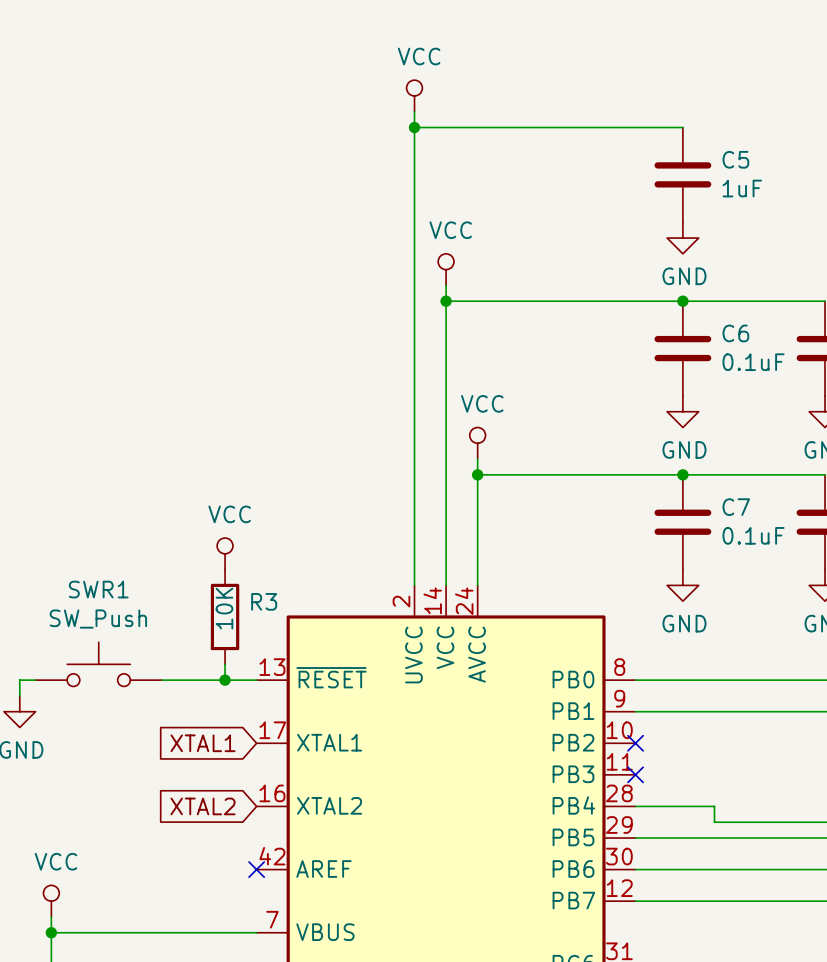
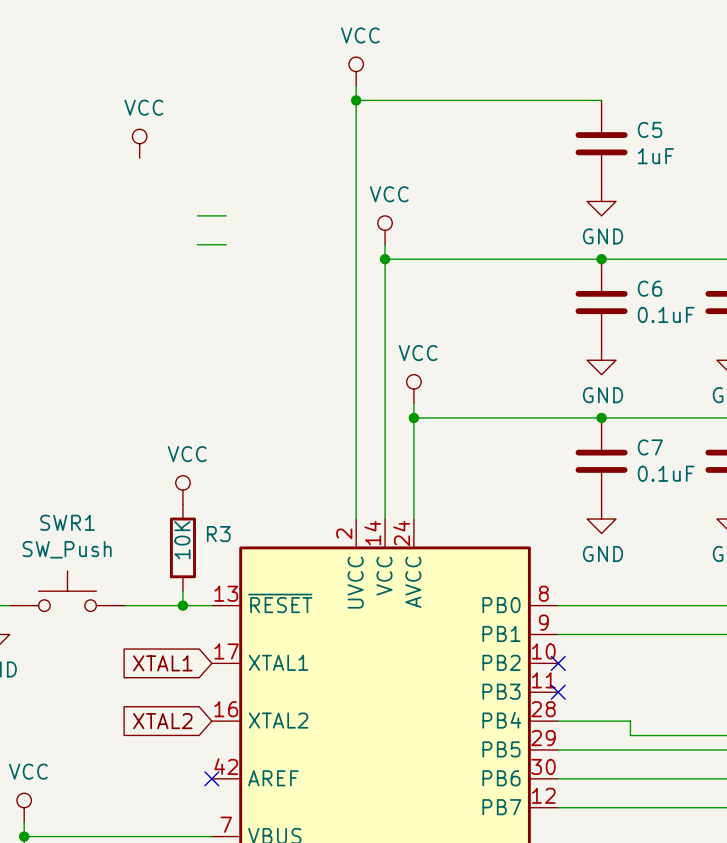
power symbol: none -> VCC (139, 143)
wire: none -> (197, 215) (226, 215)
wire: none -> (197, 244) (226, 244)

